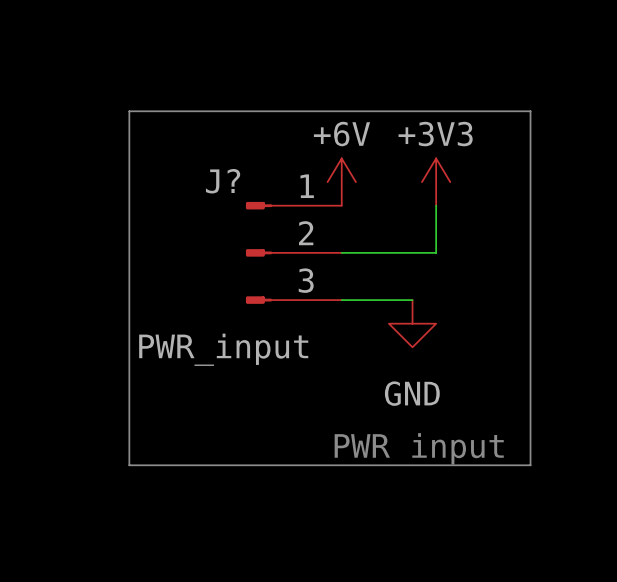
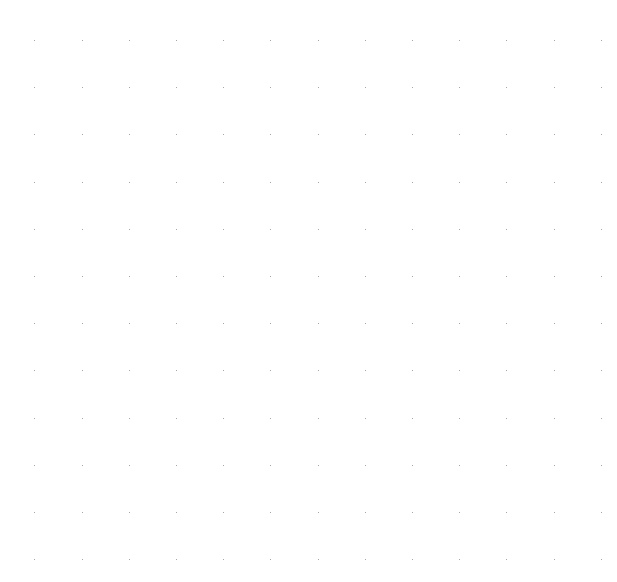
line: (129, 111) (530, 111) (530, 465) (129, 465) (129, 111) -> none
power symbol: +6V (341, 182) -> none
power symbol: +3V3 (436, 182) -> none
wire: (436, 205) (436, 252) (341, 252) -> none
J?: PWR_input (293, 252) -> none
wire: (341, 300) (412, 300) -> none
power symbol: GND (412, 323) -> none
text: PWR input (419, 448) -> none

